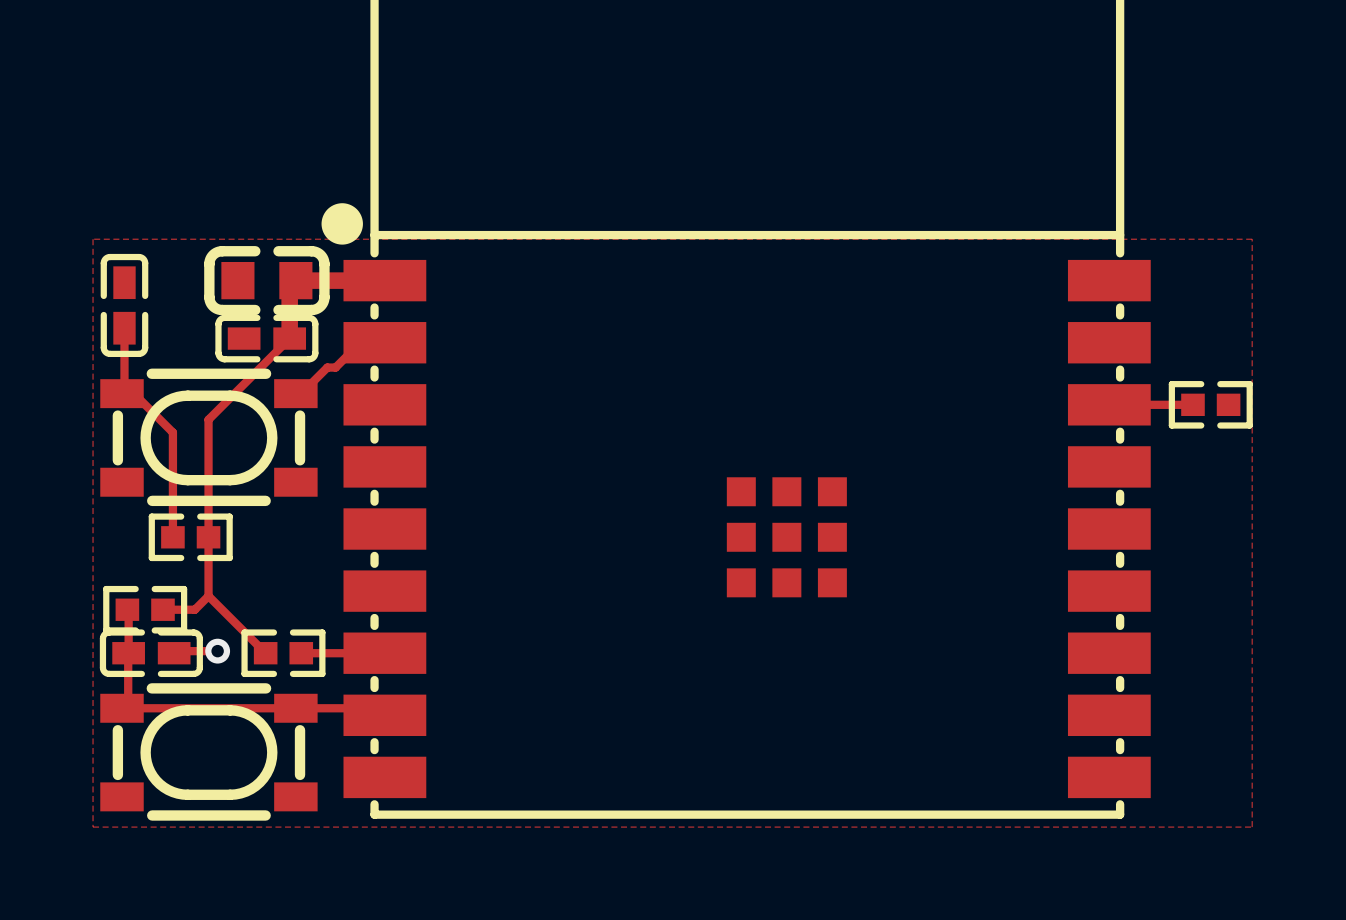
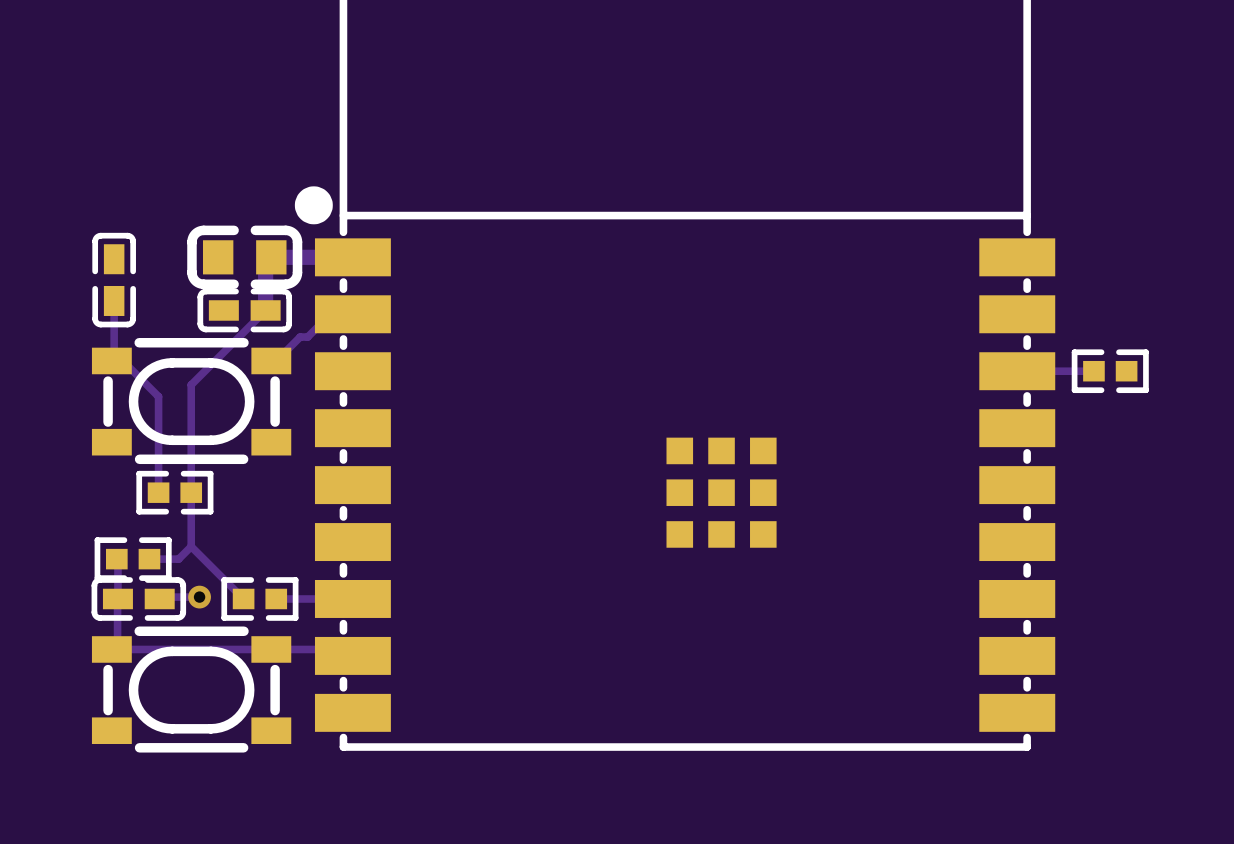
zone outline: (93, 239) (93, 827) (1252, 827) (1252, 239) (93, 239) -> none

